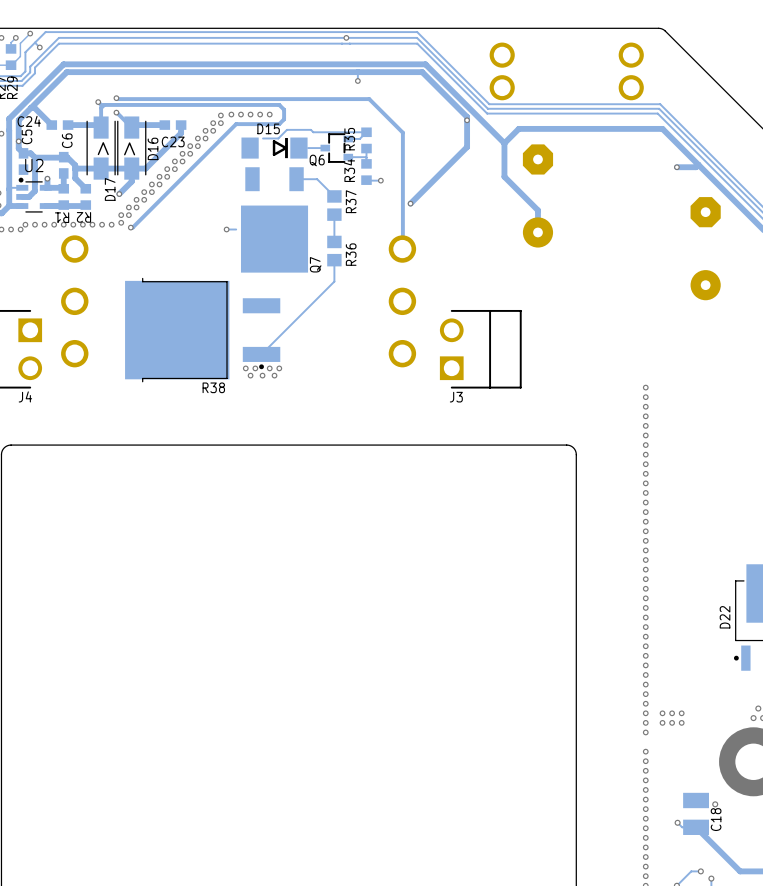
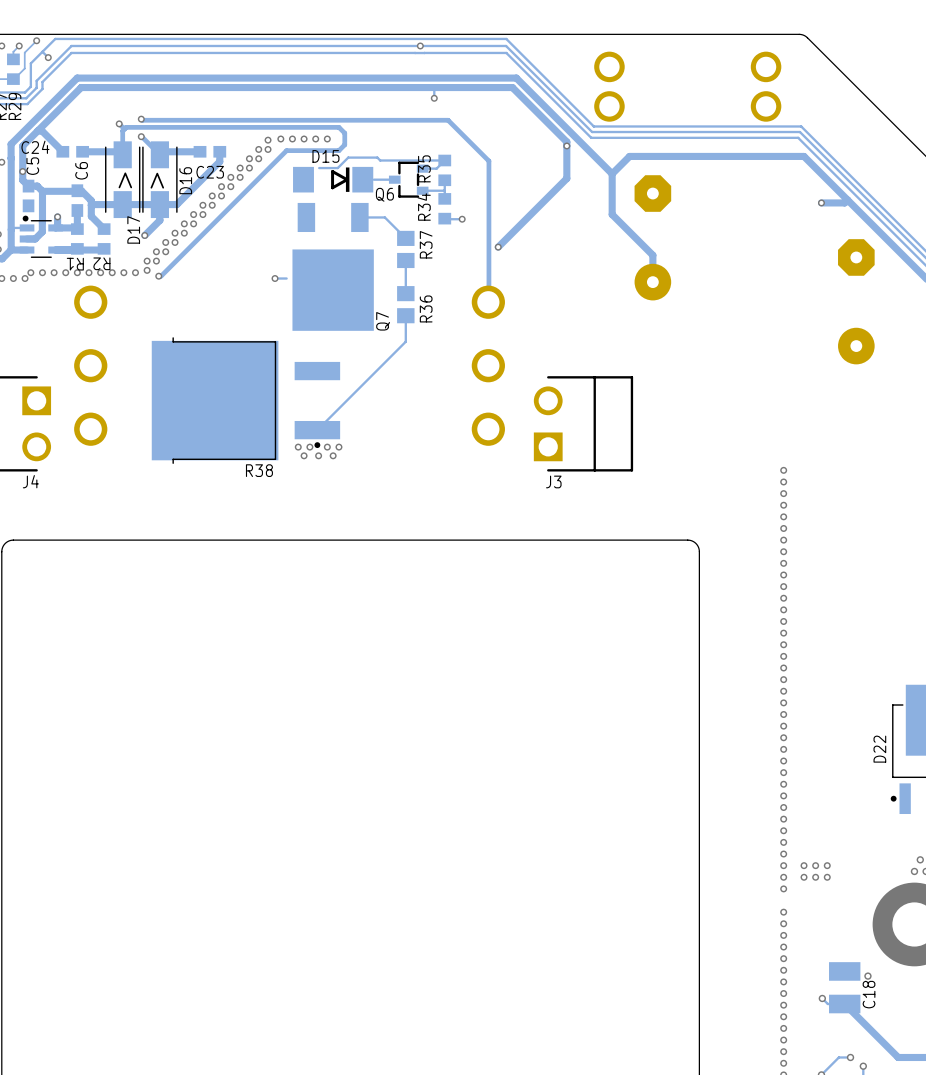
U2 name: U2 (34, 165) -> none

